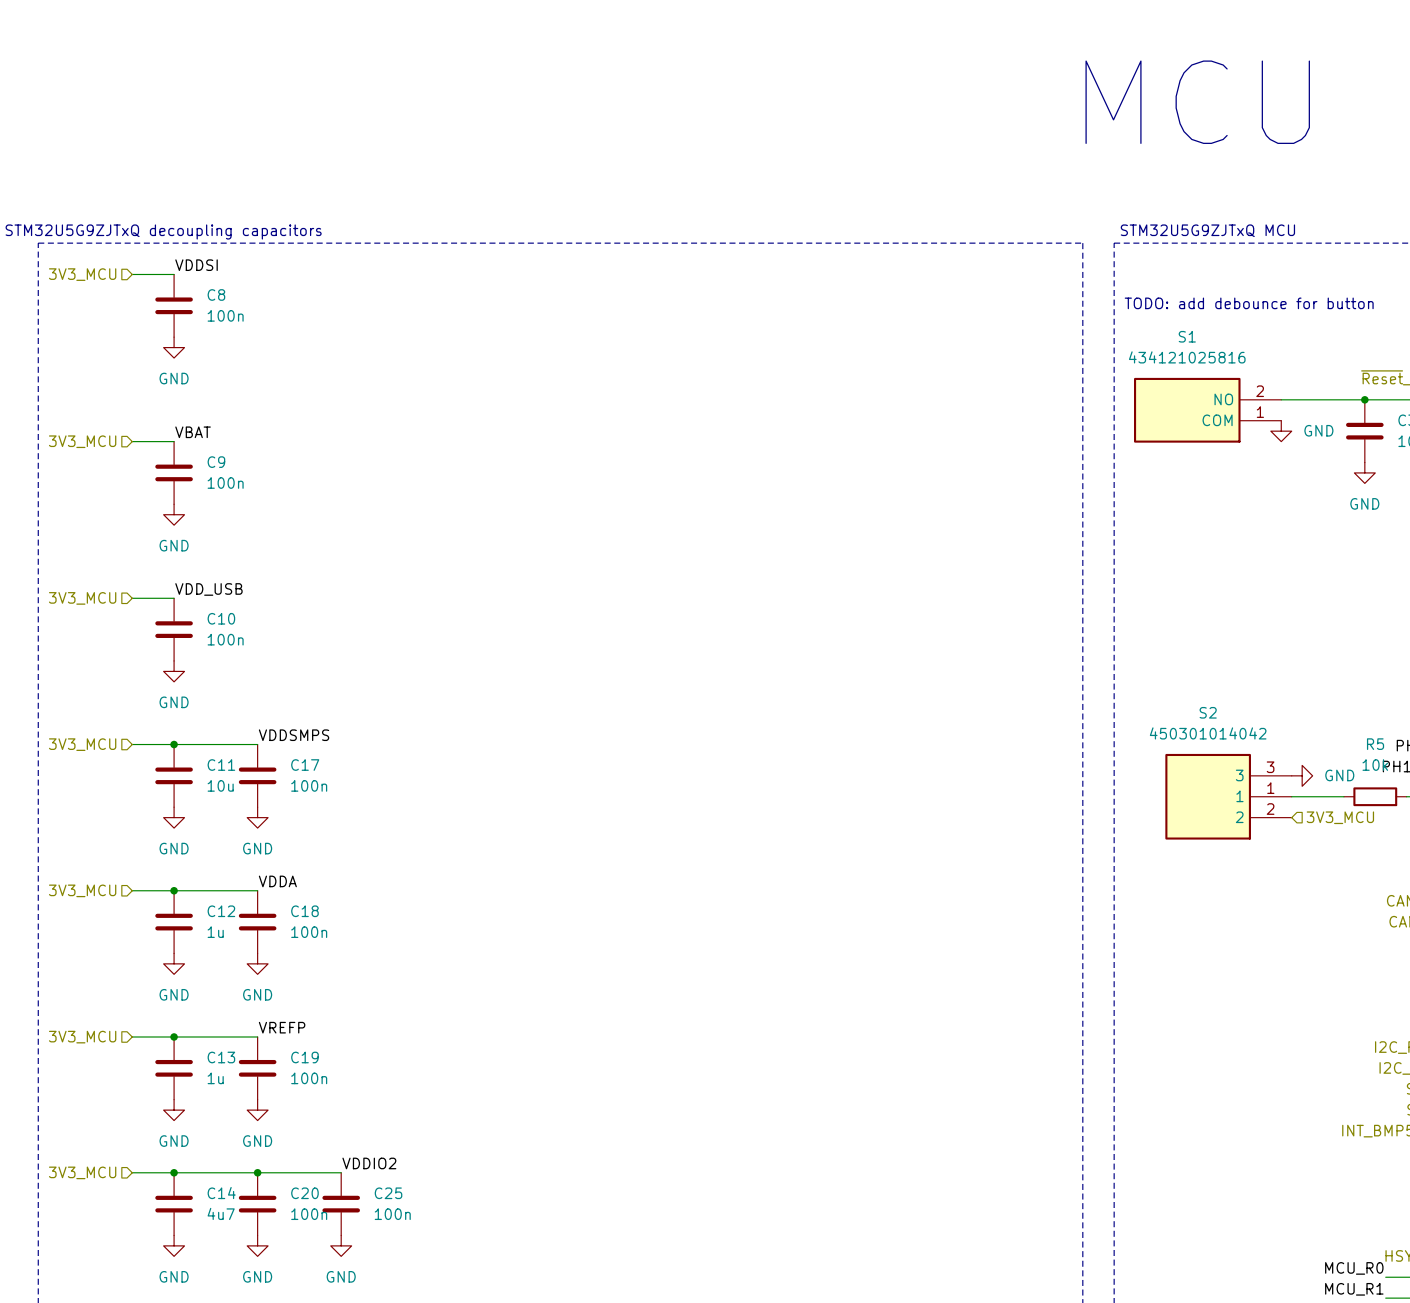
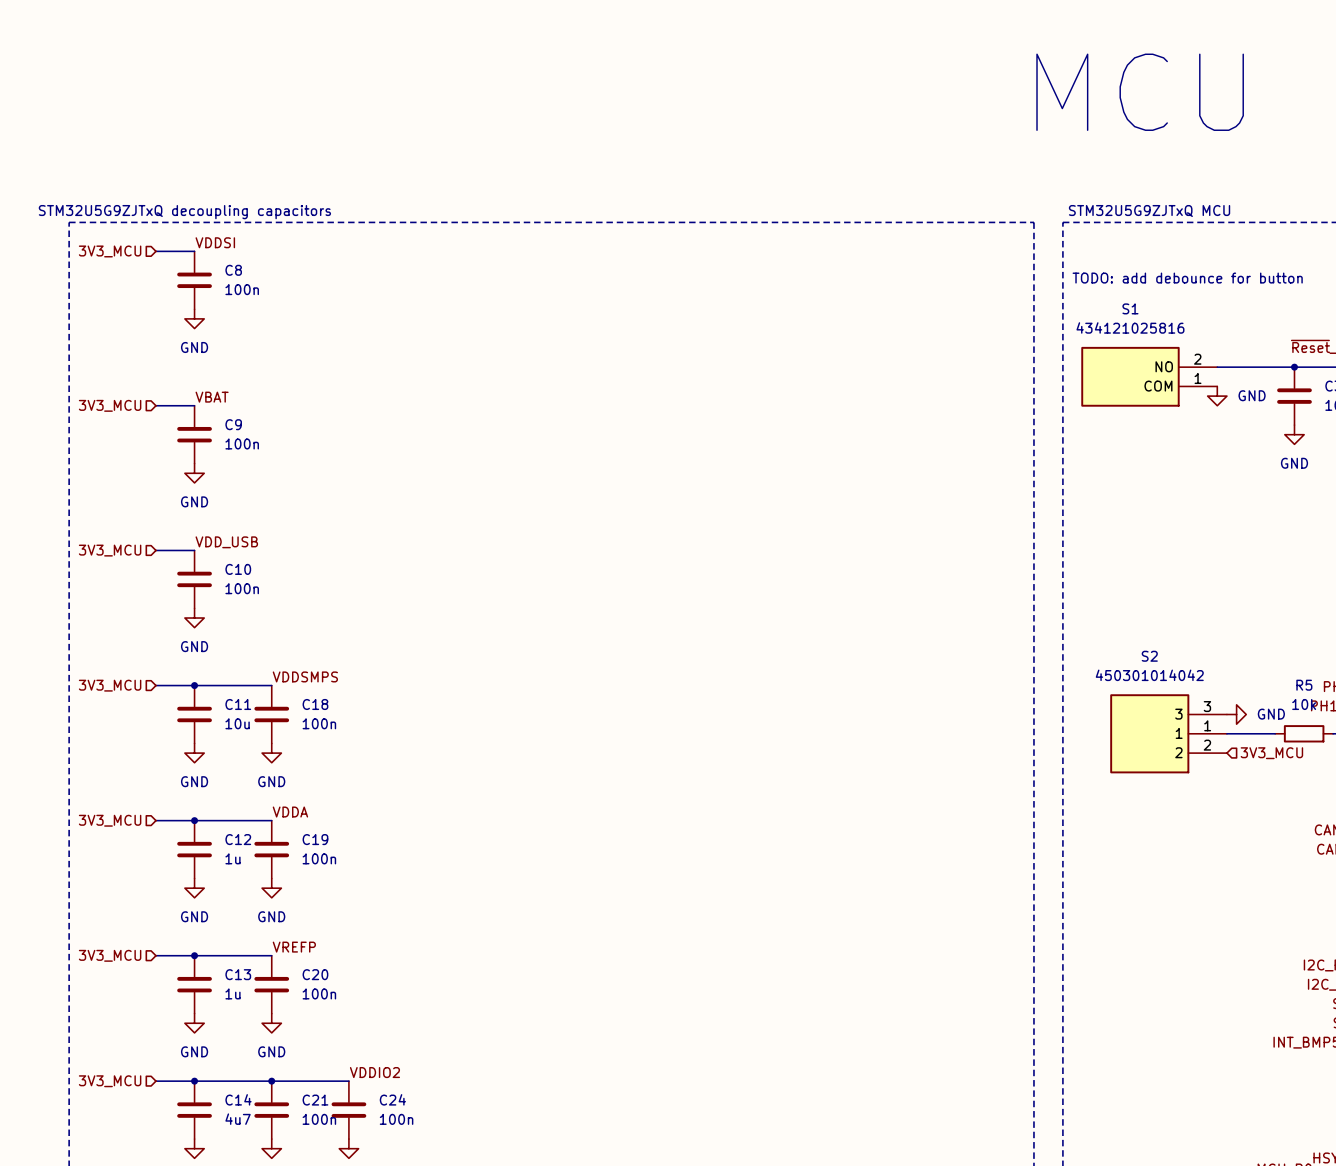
C17 name: C17 (305, 765) -> C18 (315, 704)
C18 name: C18 (304, 911) -> C19 (315, 839)
C19 name: C19 (304, 1057) -> C20 (315, 974)
C20 name: C20 (304, 1193) -> C21 (315, 1100)
C25 name: C25 (388, 1193) -> C24 (392, 1099)

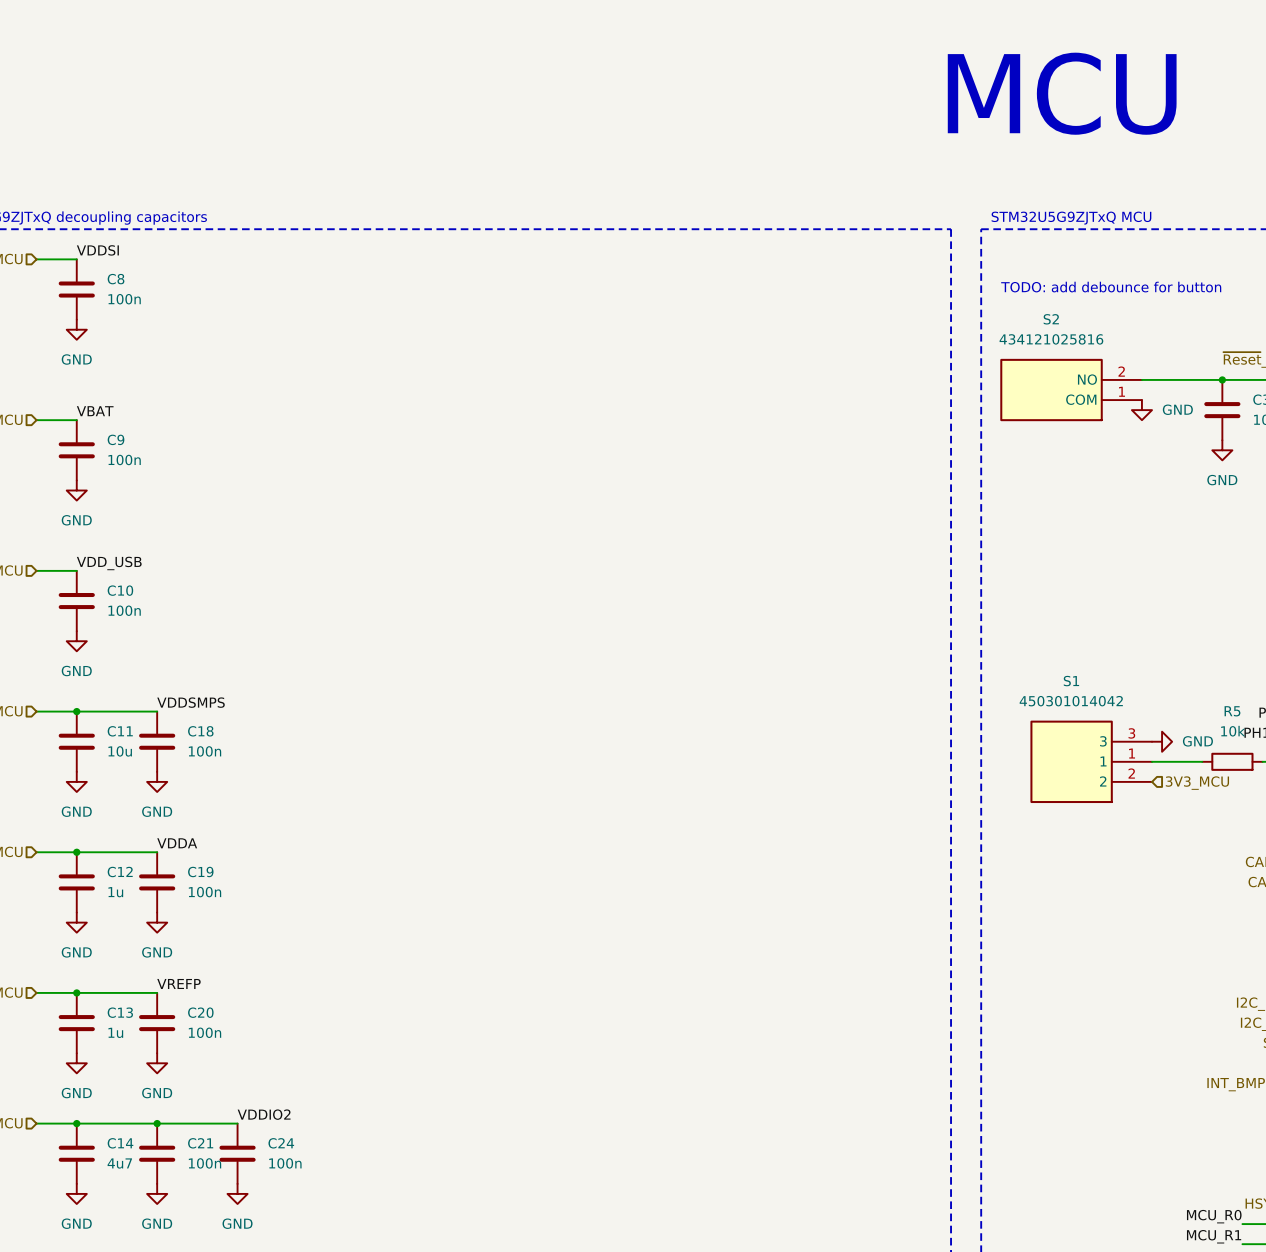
S1 name: S1 (1130, 308) -> S2 (1051, 319)
S2 name: S2 (1149, 656) -> S1 (1071, 681)

